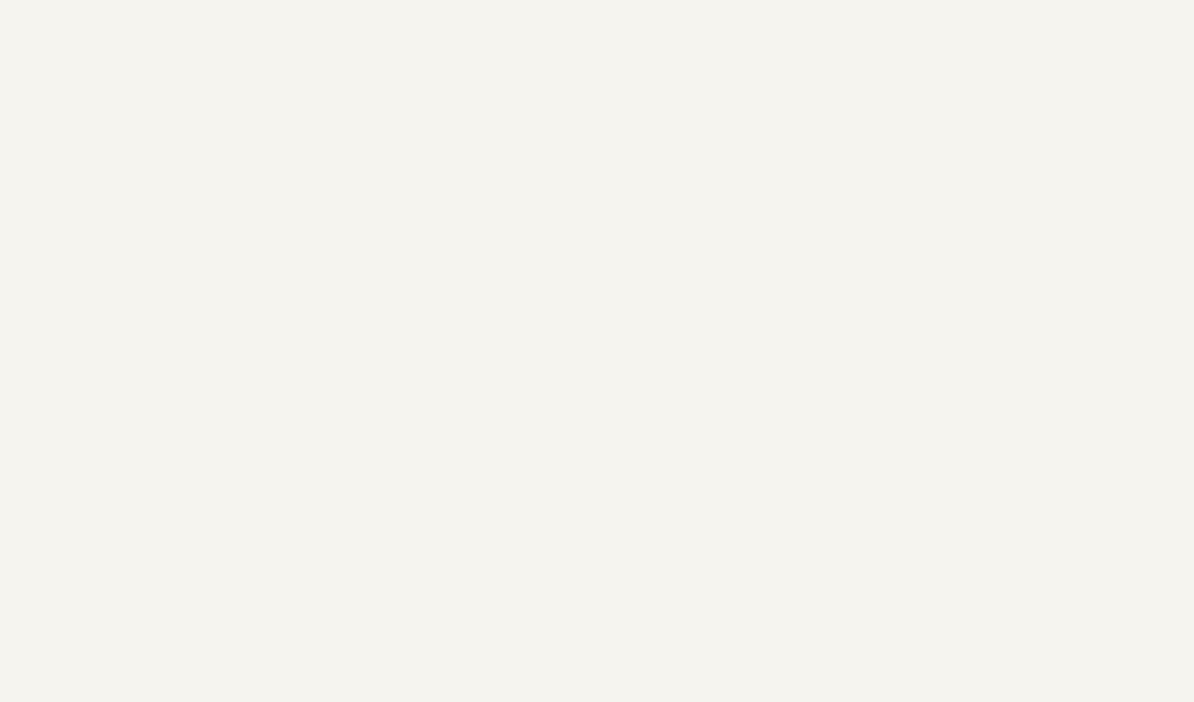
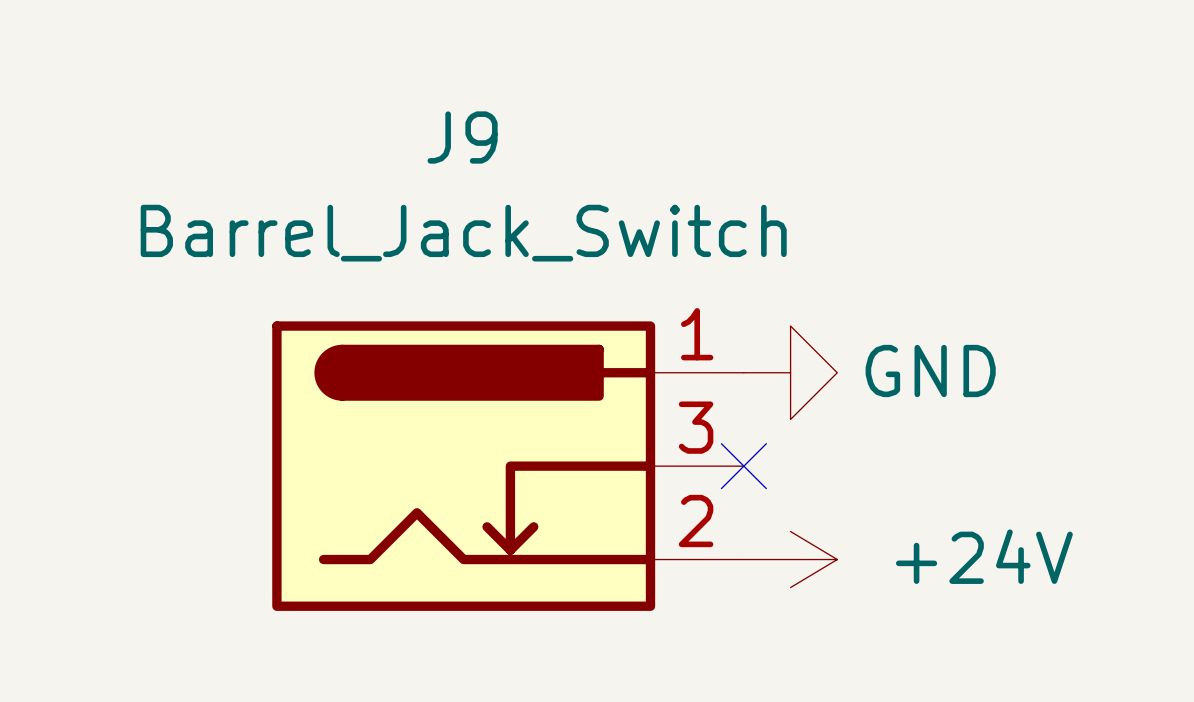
power symbol: none -> GND (790, 372)
J9: none -> Barrel_Jack_Switch (508, 466)
no-connect mark: none -> (743, 466)
power symbol: none -> +24V (790, 559)

